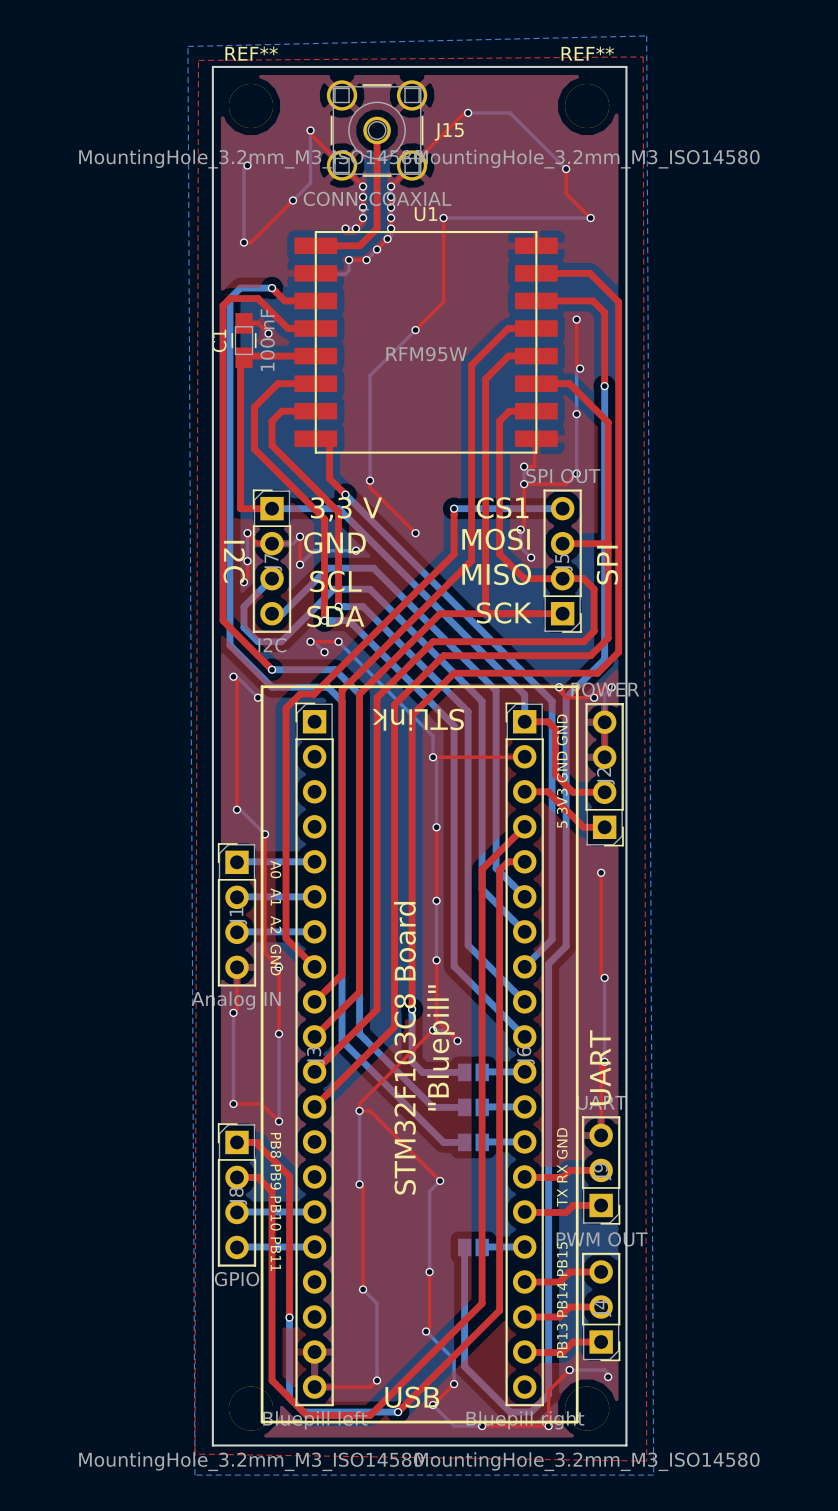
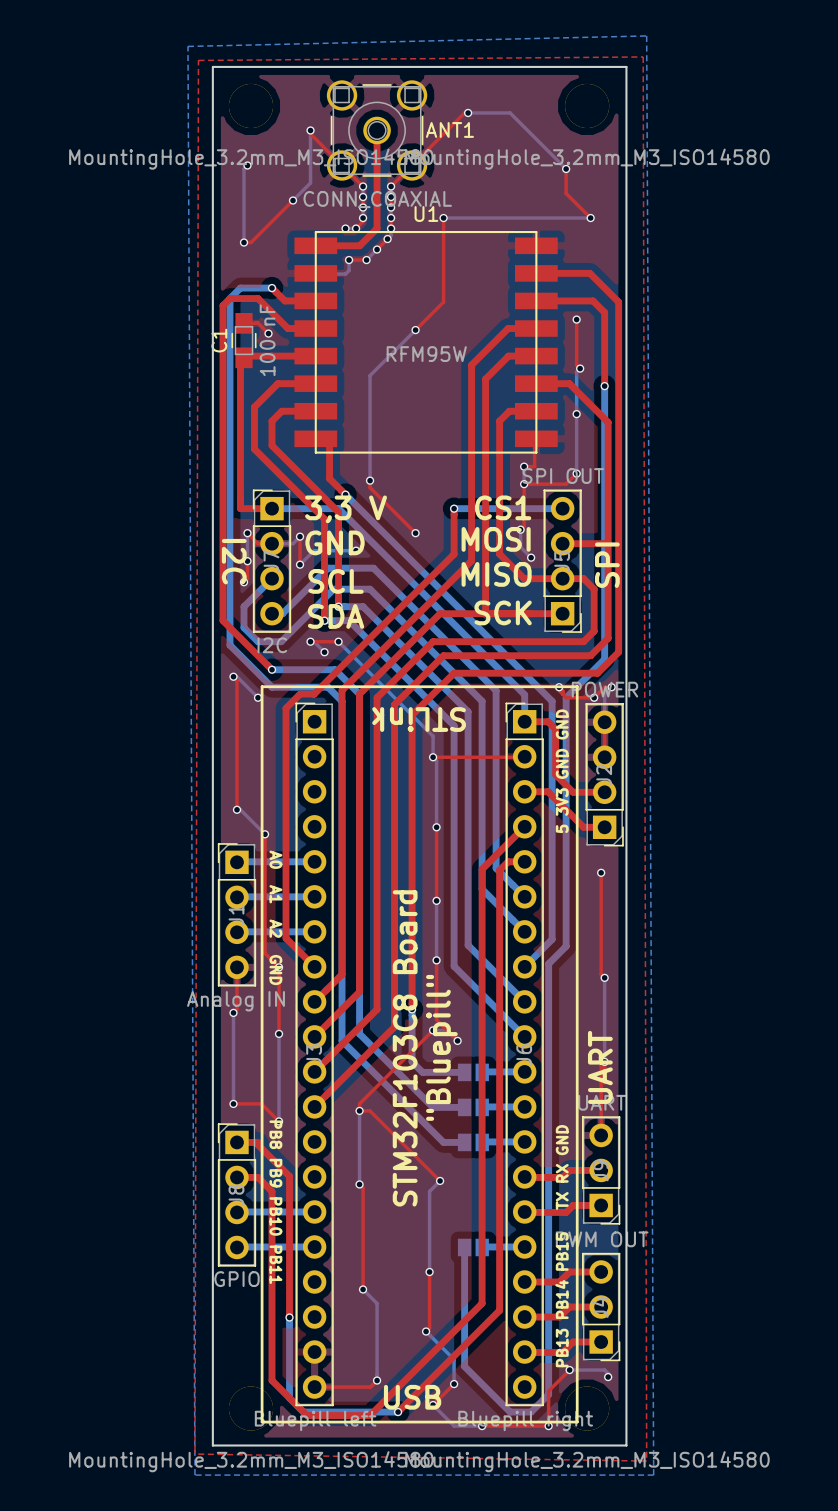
REF** name: REF** (251, 53) -> none
REF** name: REF** (587, 53) -> none
J15 name: J15 (449, 131) -> ANT1 (449, 129)

